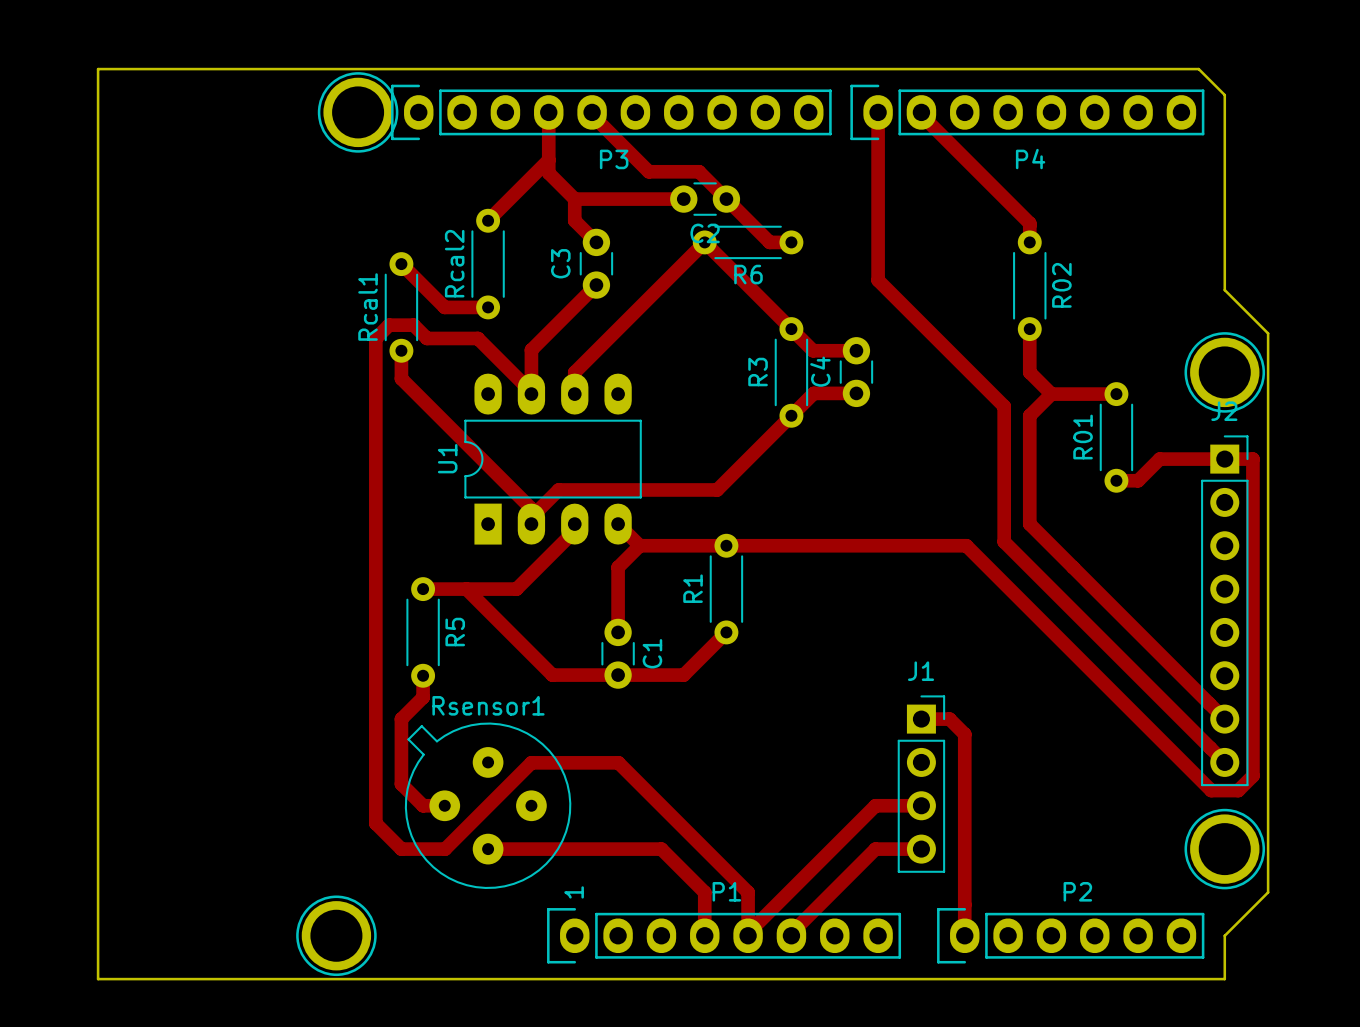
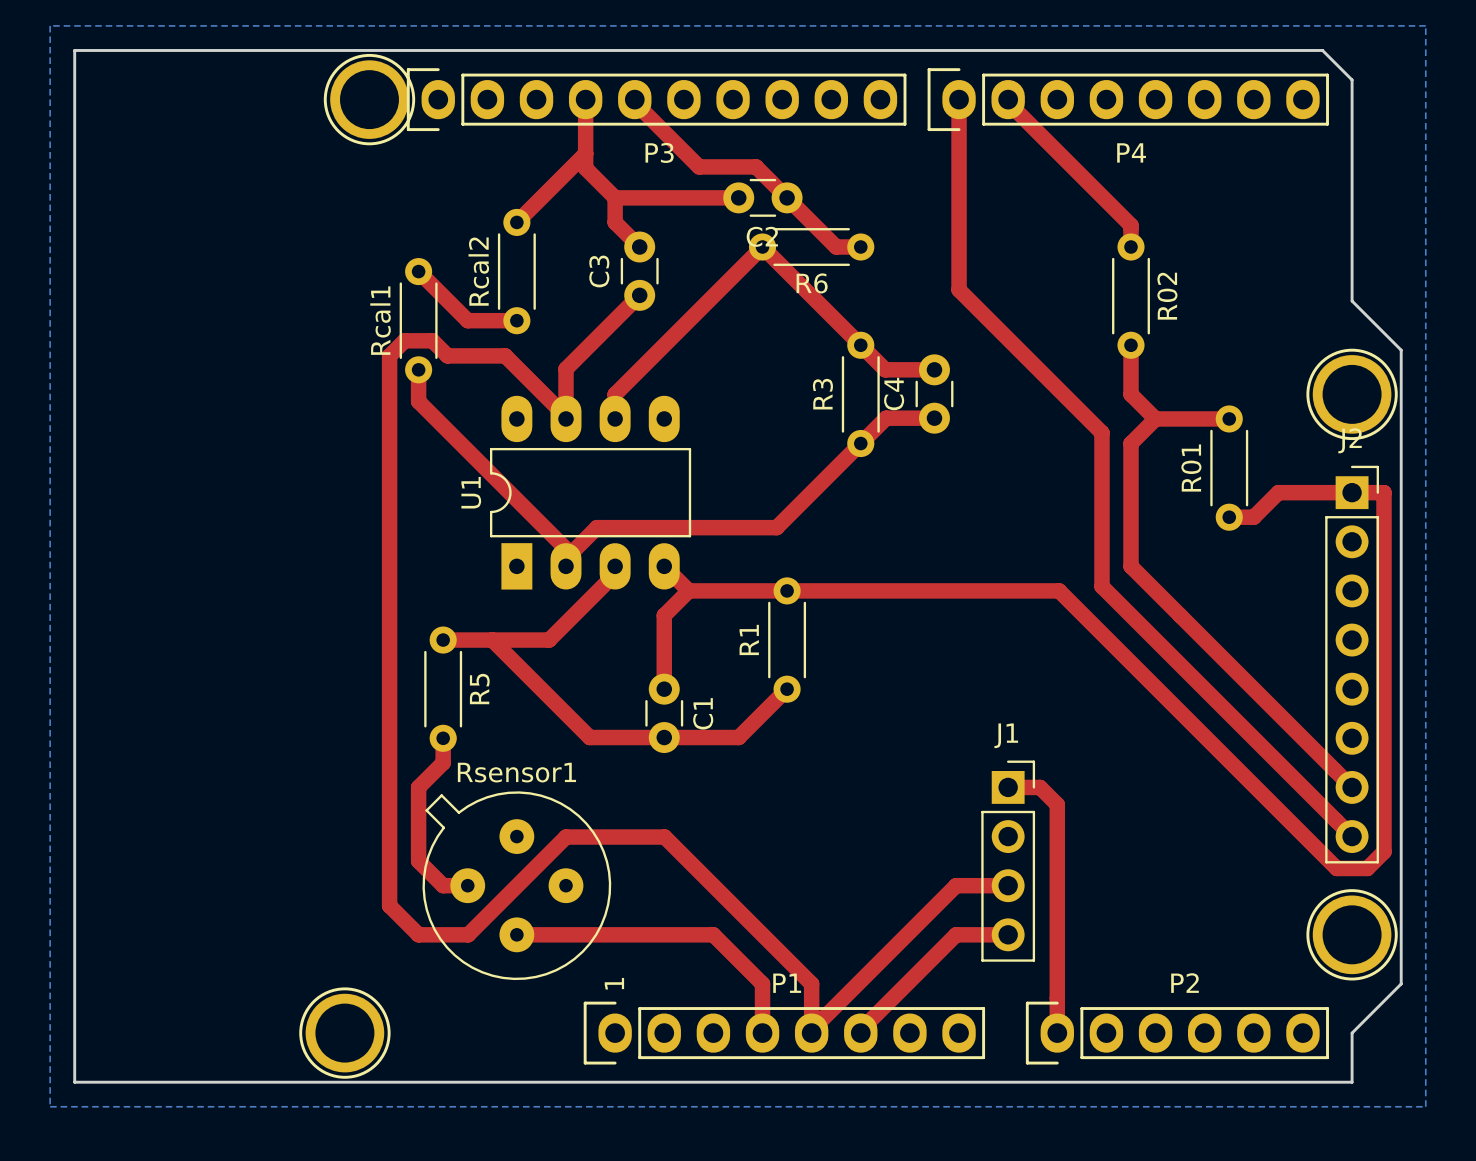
bottom zone outline: none -> (50, 25) (50, 1106) (1425, 1106) (1425, 25) (50, 25)

